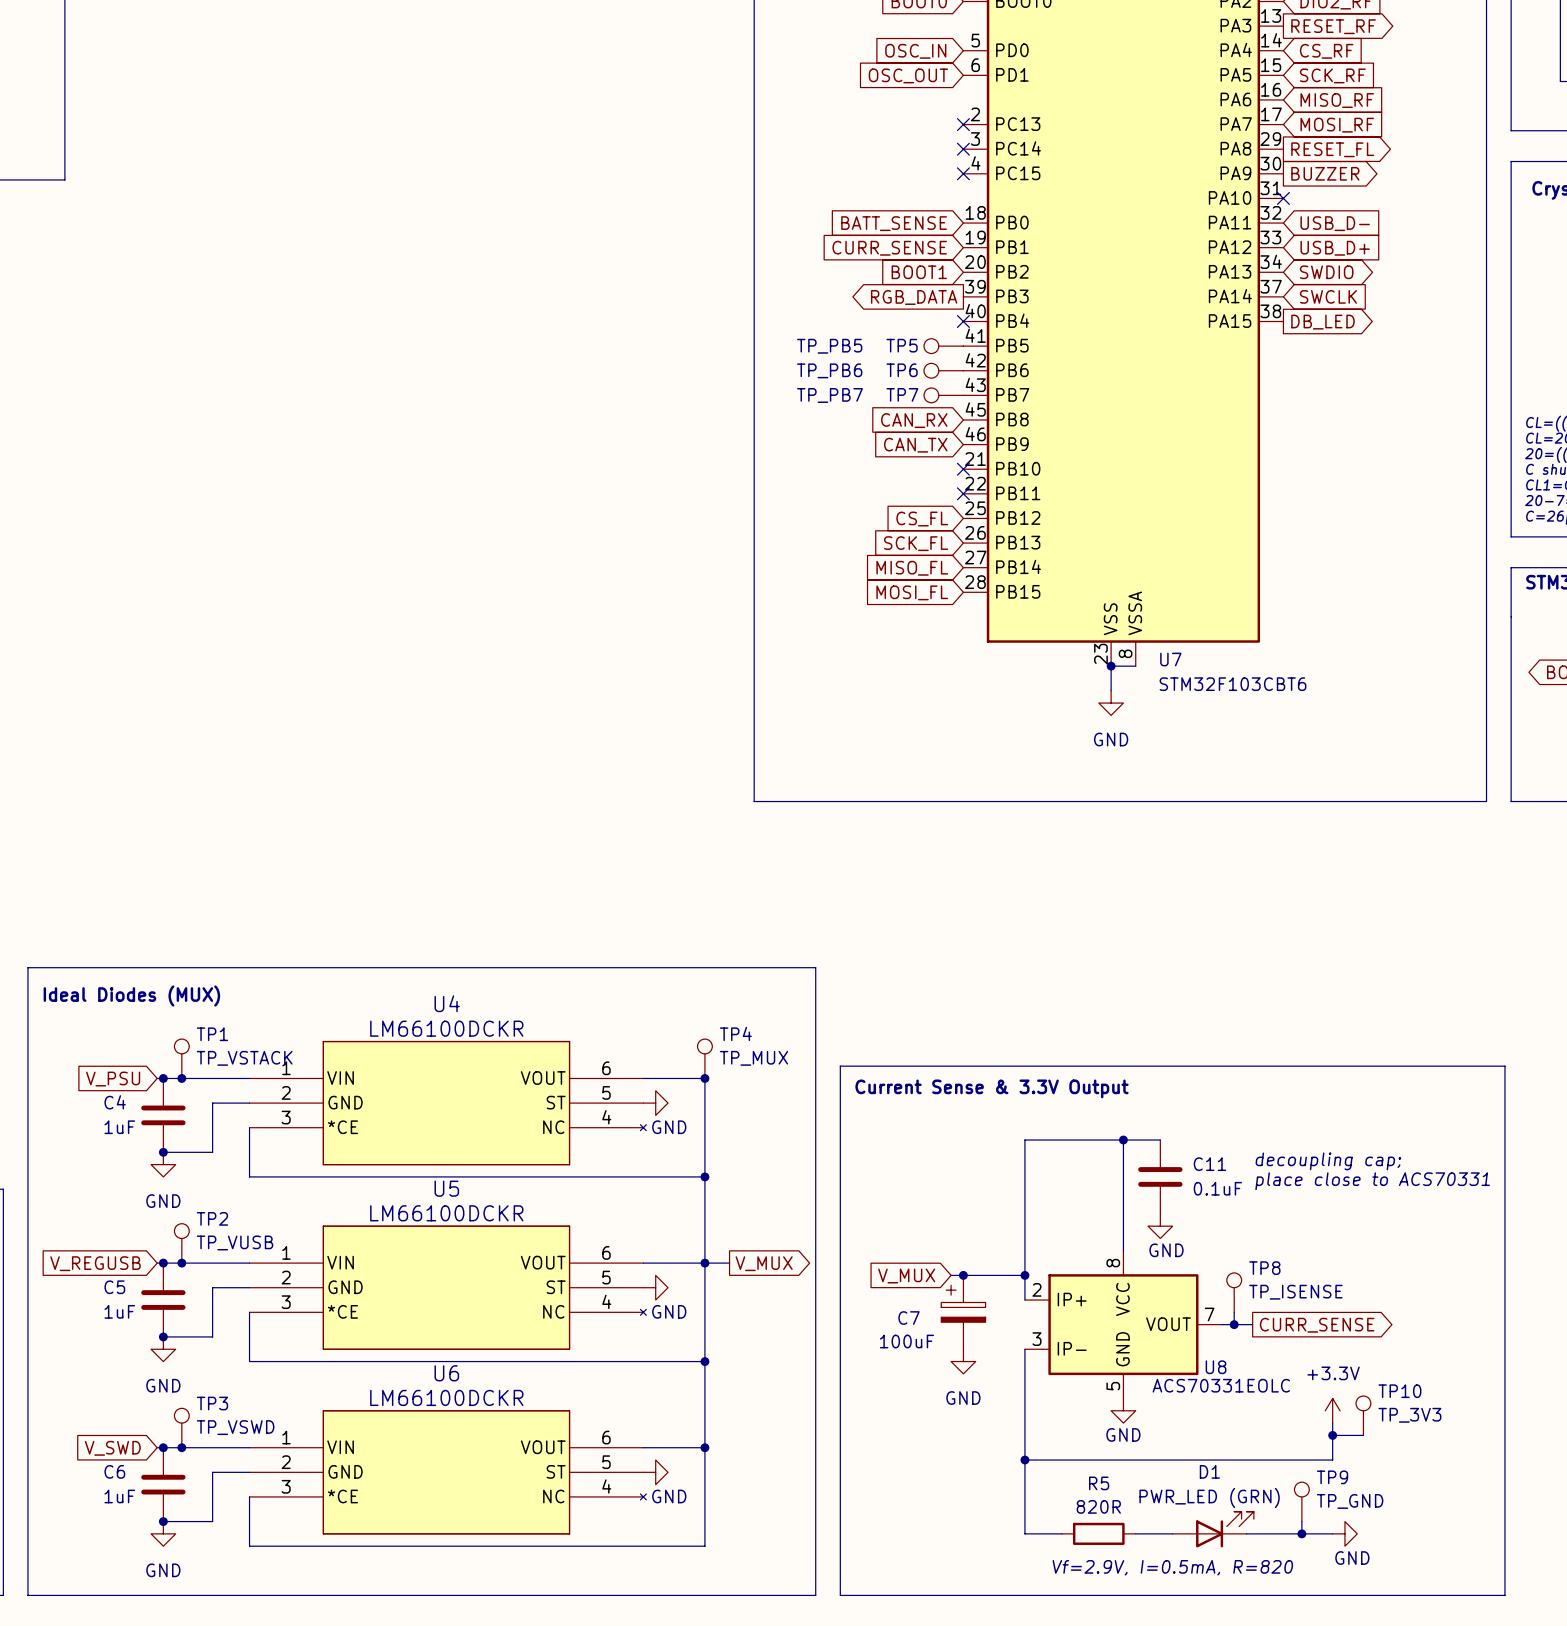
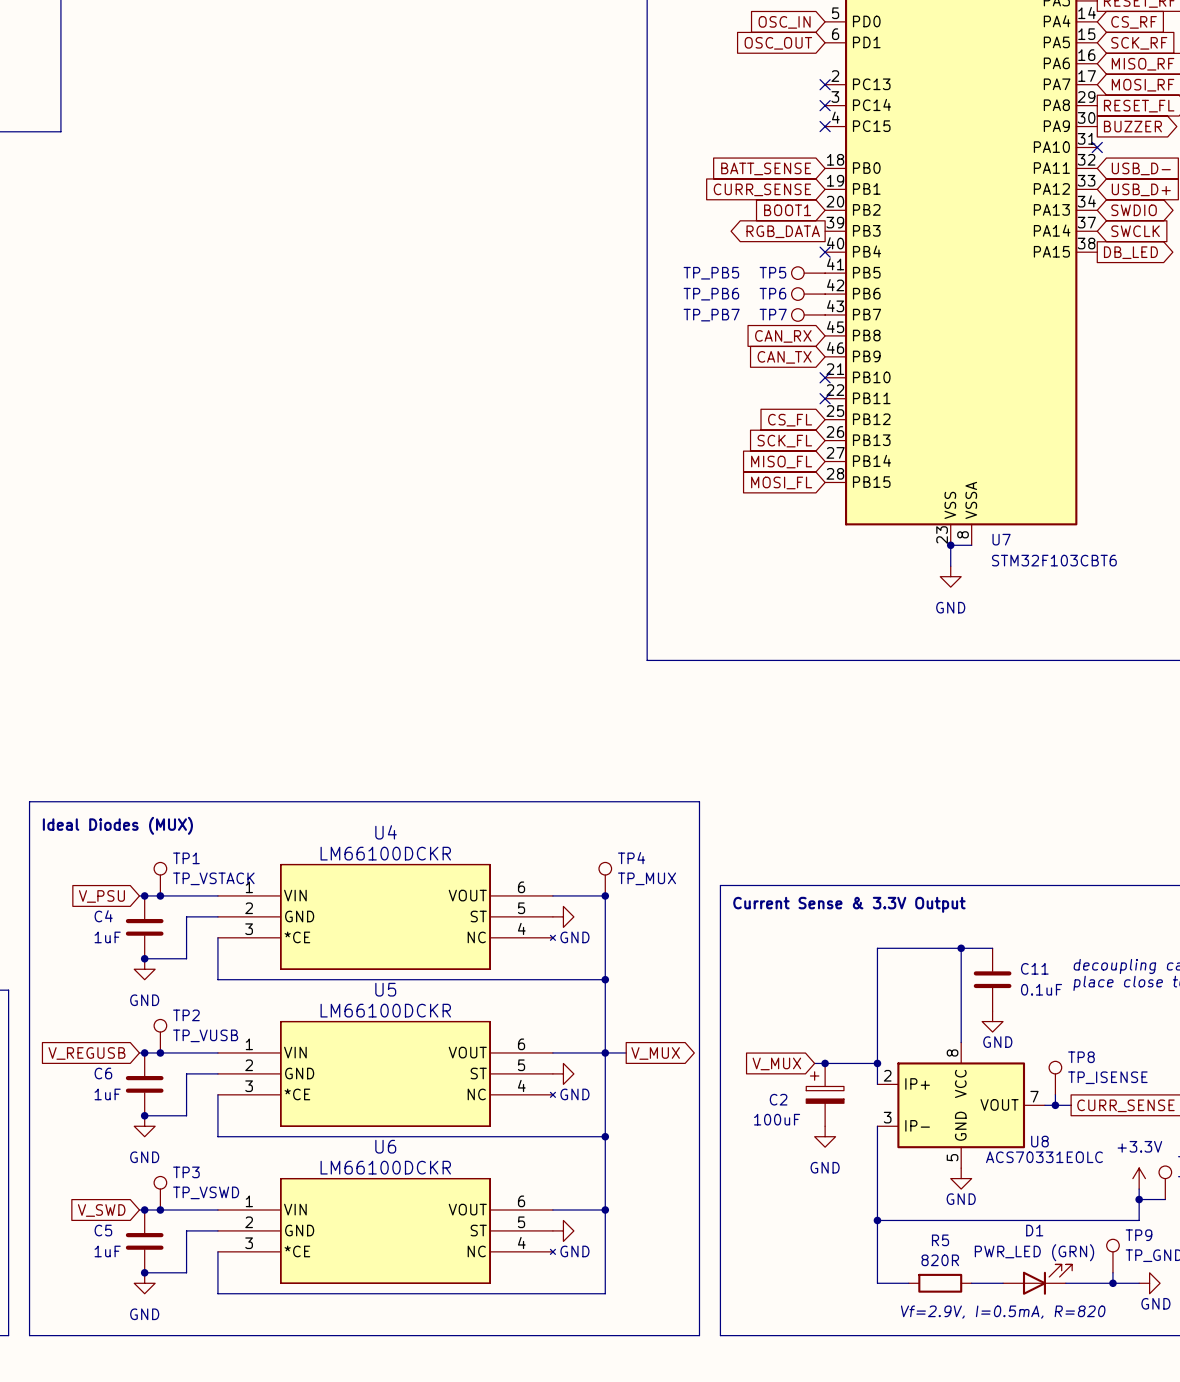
C5 name: C5 (114, 1287) -> C6 (103, 1073)
C7 name: C7 (908, 1318) -> C2 (778, 1099)
C6 name: C6 (114, 1471) -> C5 (103, 1230)

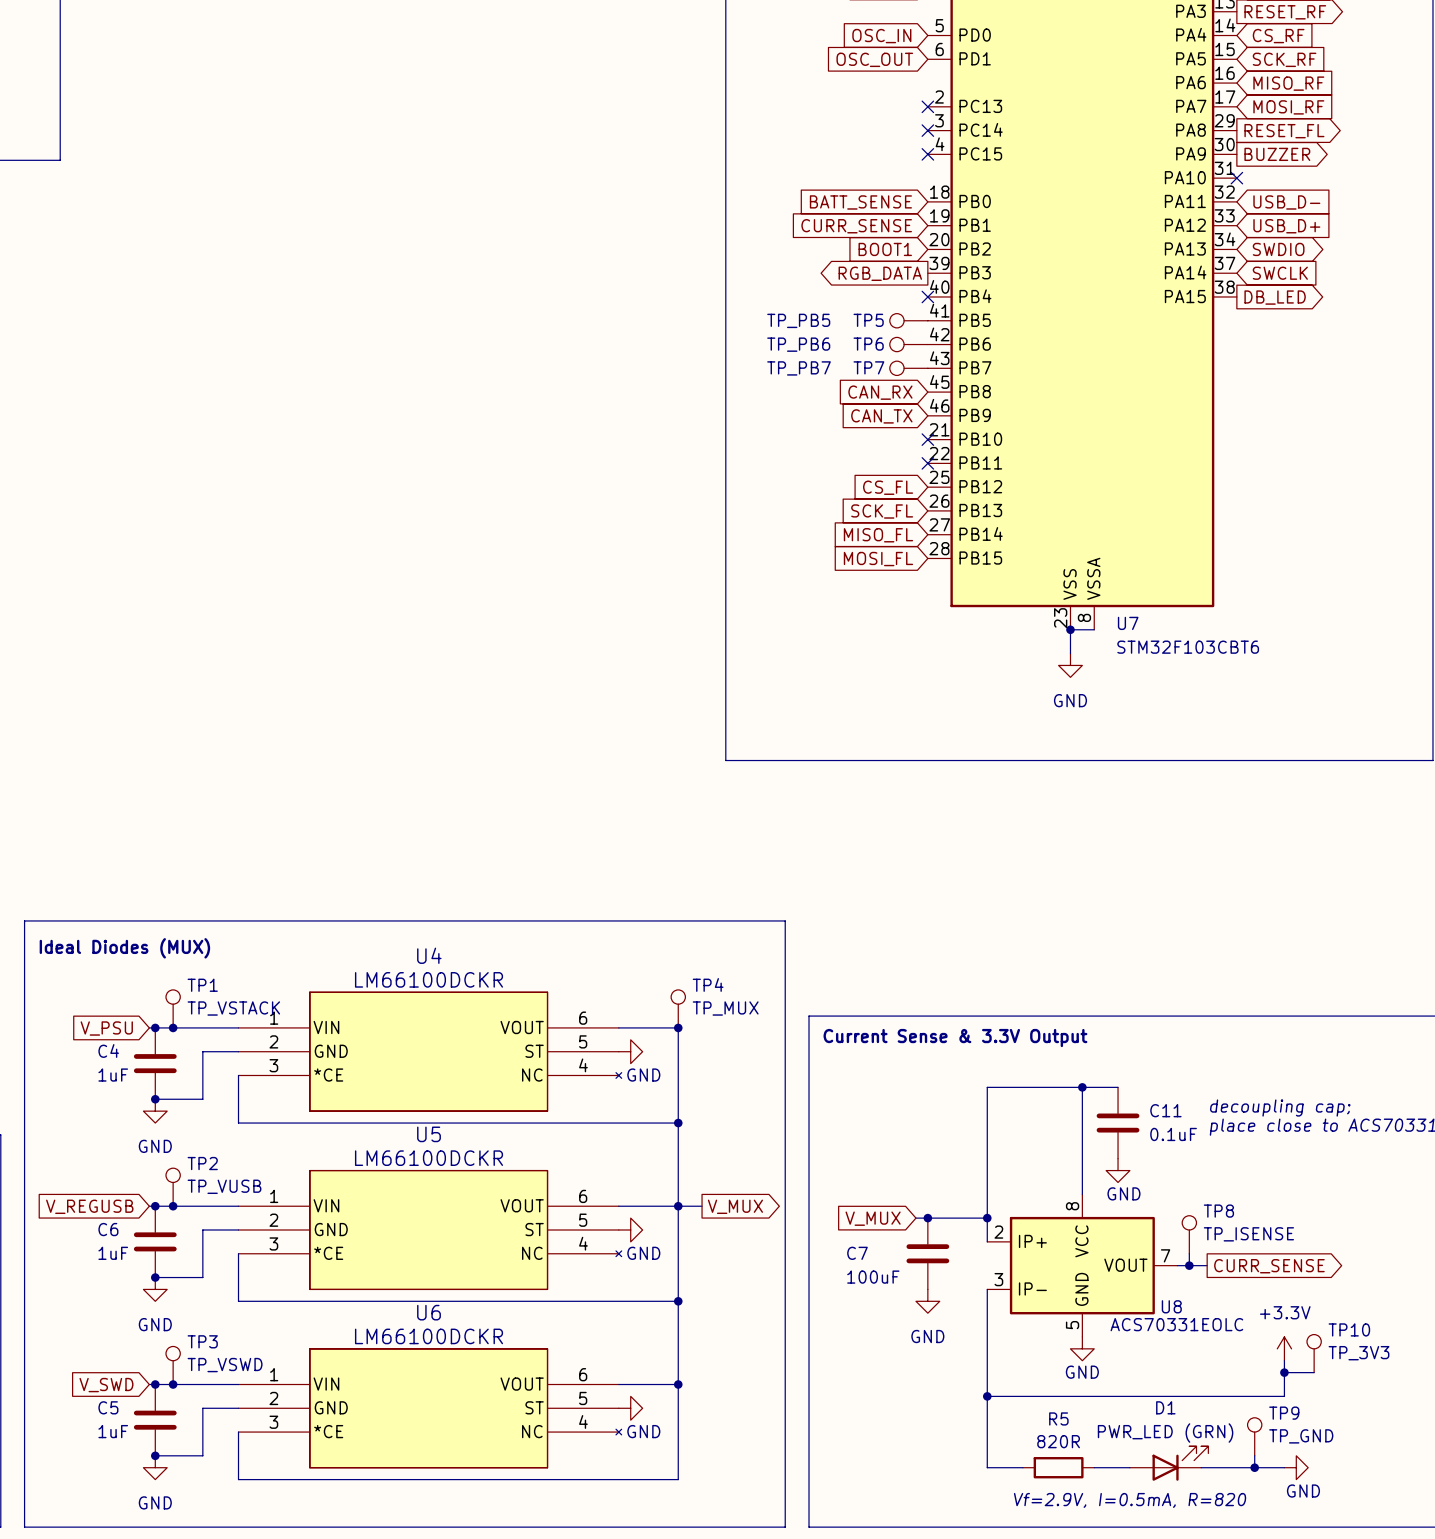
C2: 100uF (825, 1094) -> none
C7: none -> 100uF (927, 1253)

